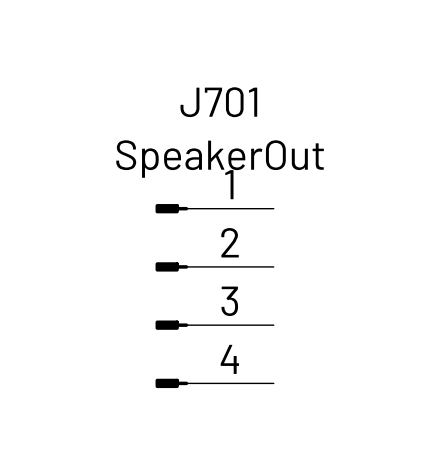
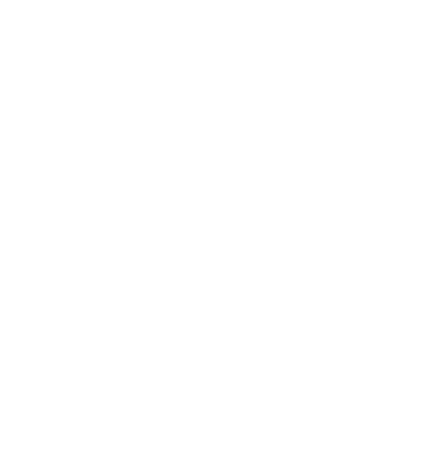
J701: SpeakerOut (214, 296) -> none

